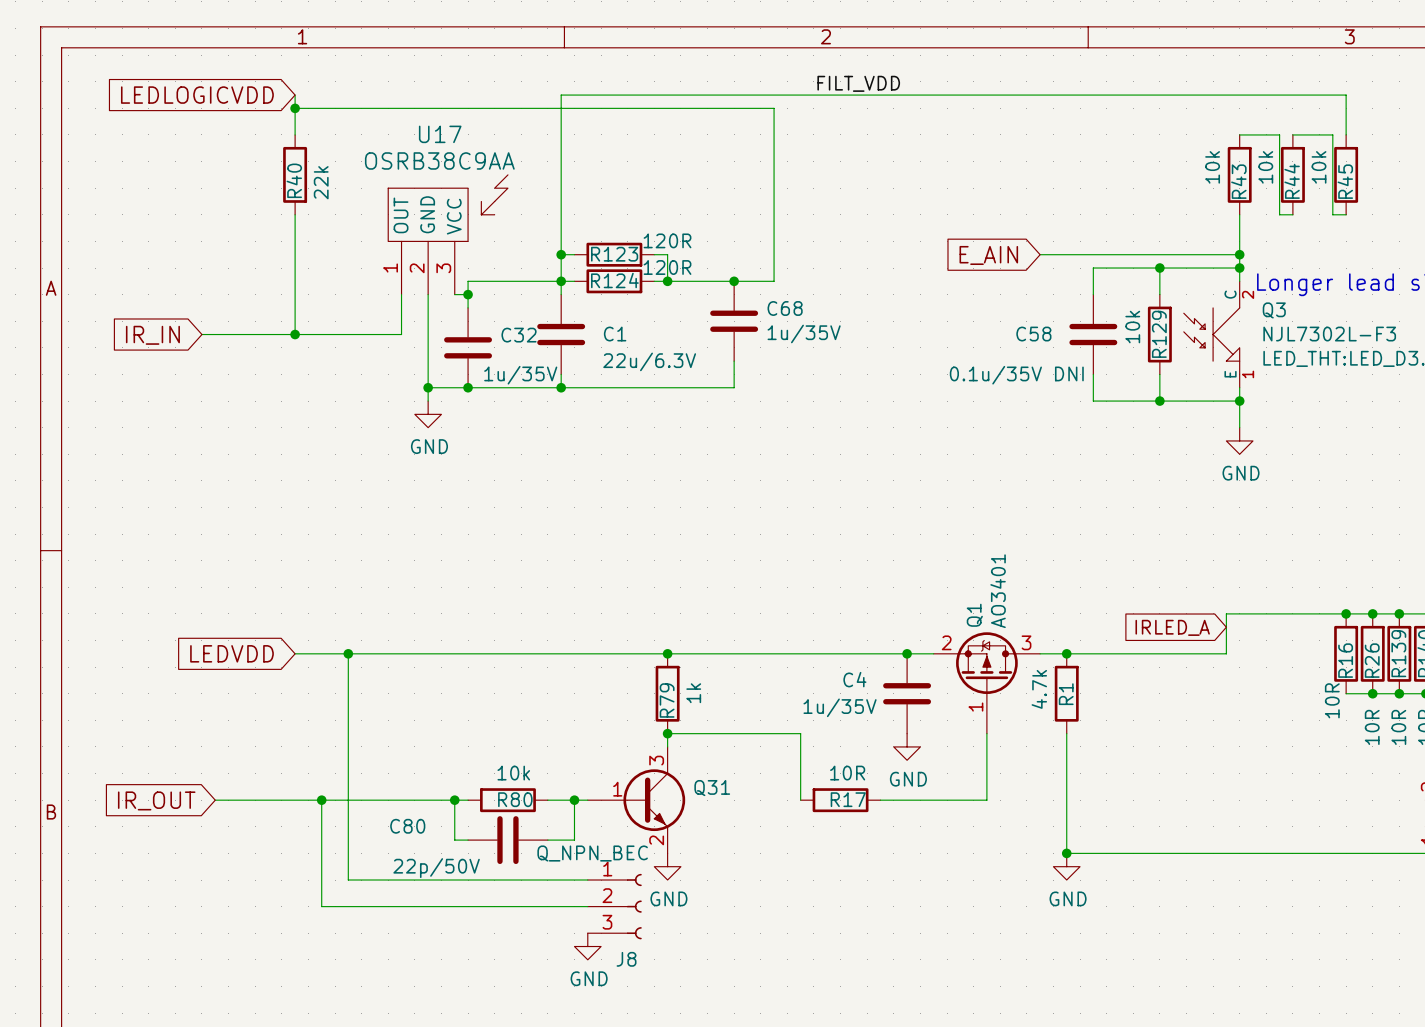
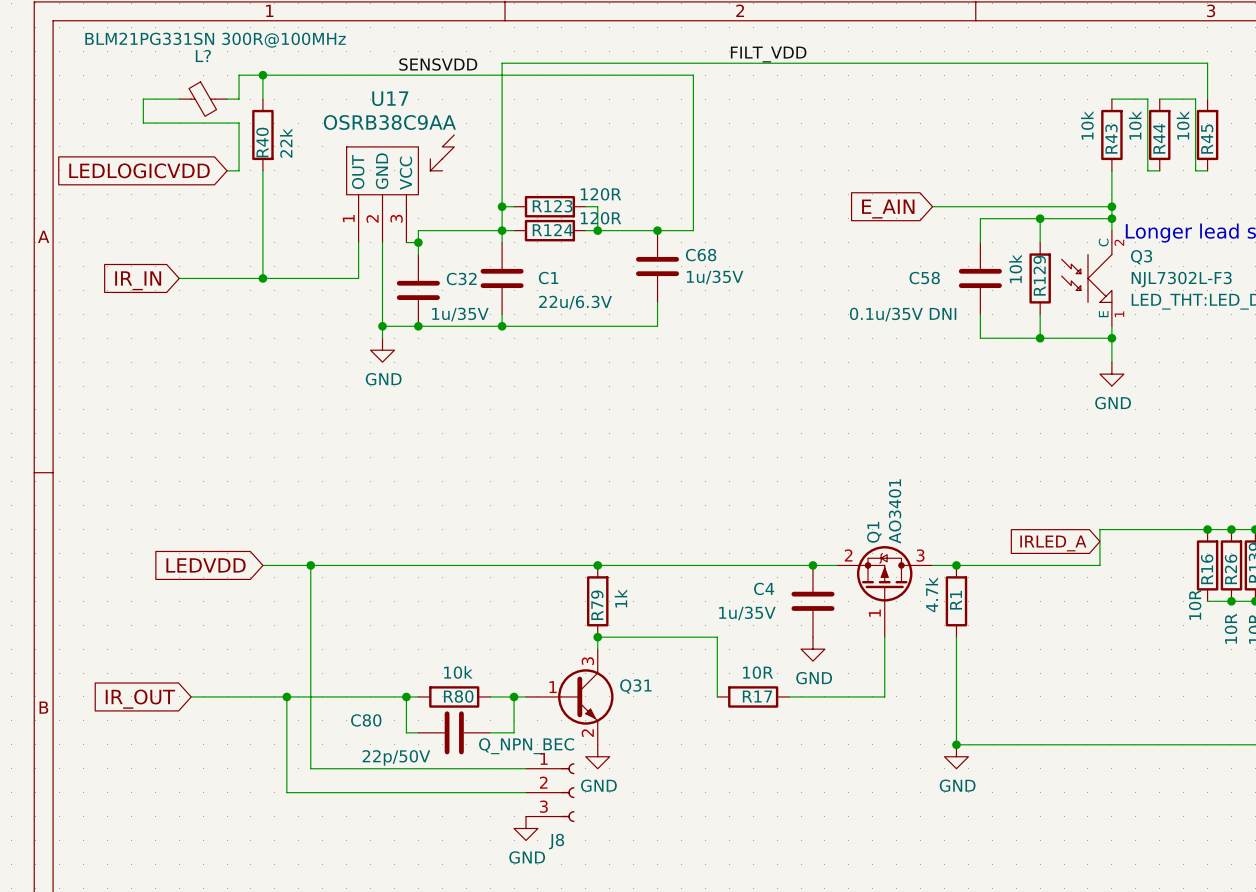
global label position: LEDLOGICVDD (197, 95) -> LEDLOGICVDD (139, 170)
wire: (295, 95) (295, 108) -> (227, 99) (239, 99) (239, 75) (262, 75)
label: none -> SENSVDD (438, 64)
wire: none -> (179, 99) (143, 99) (143, 123) (239, 123) (239, 170) (227, 170)
L?: none -> BLM21PG331SN 300R@100MHz (203, 99)

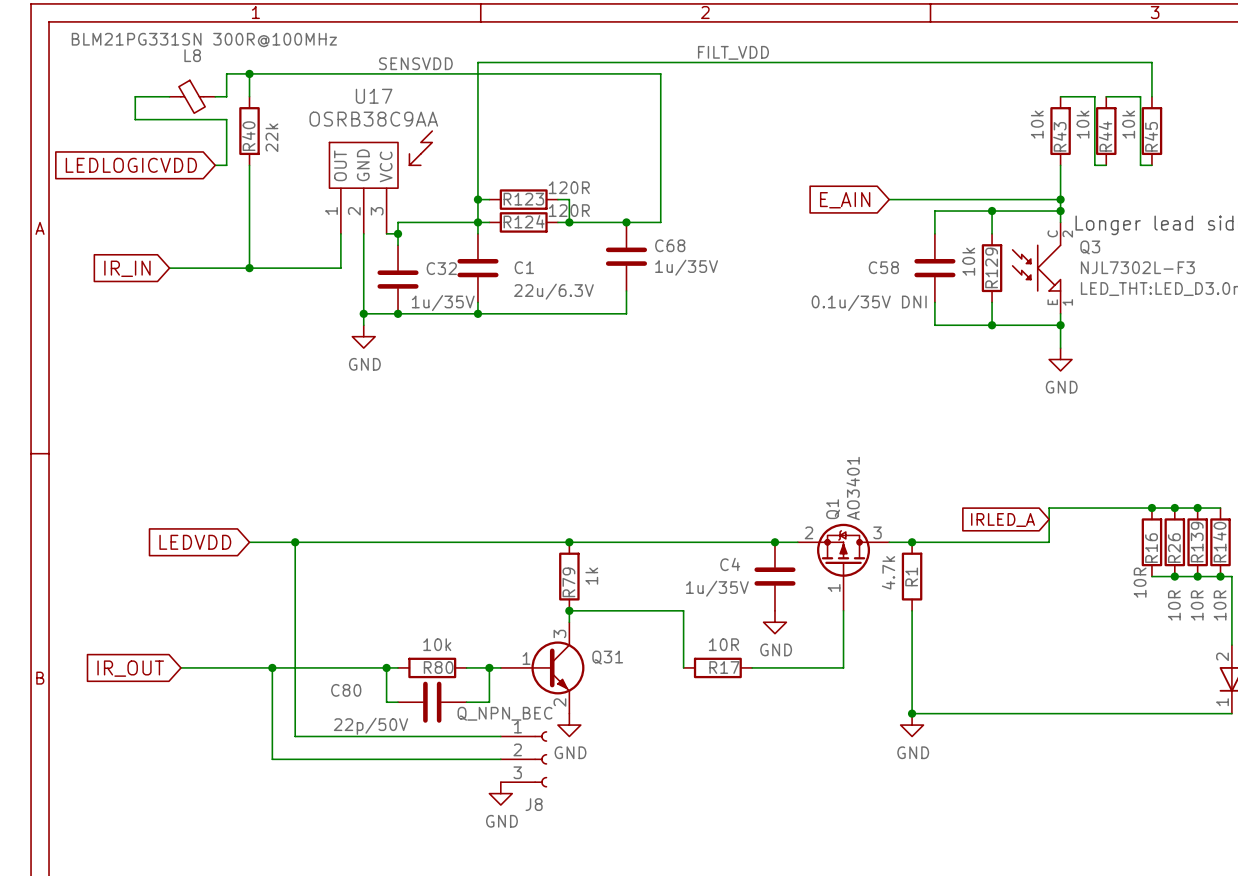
L? name: L? (203, 55) -> L8 (192, 55)

